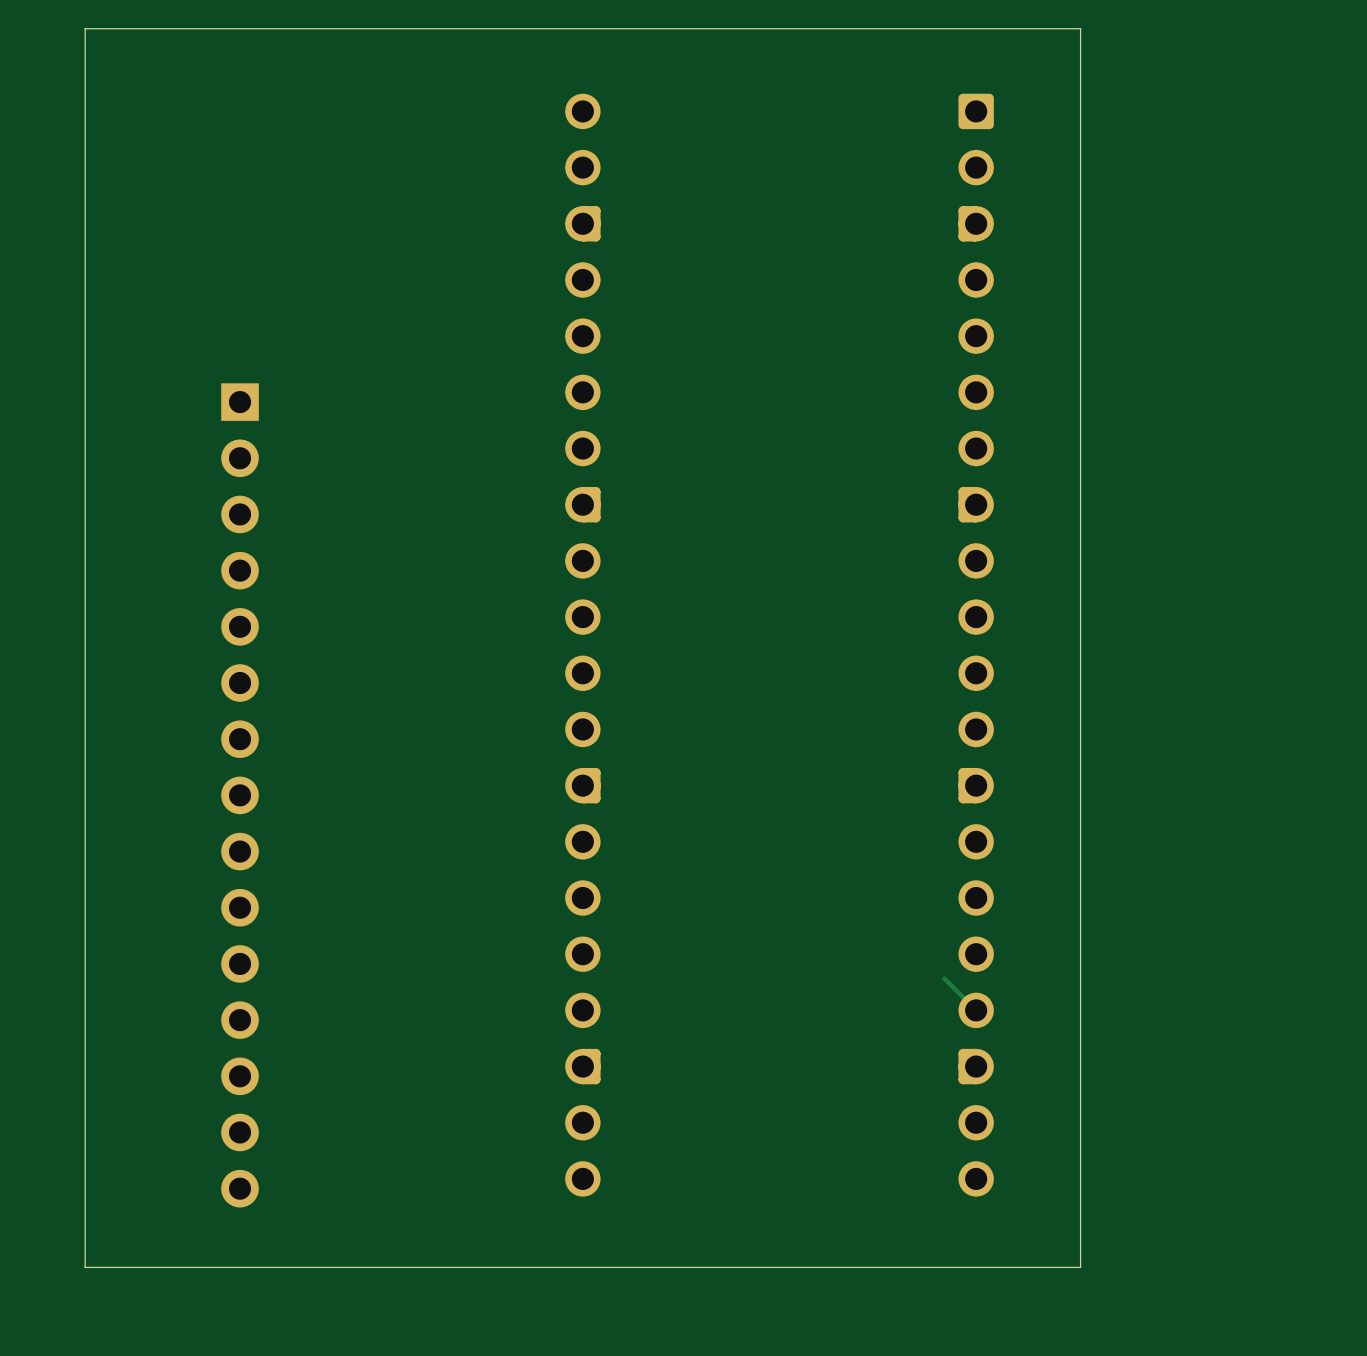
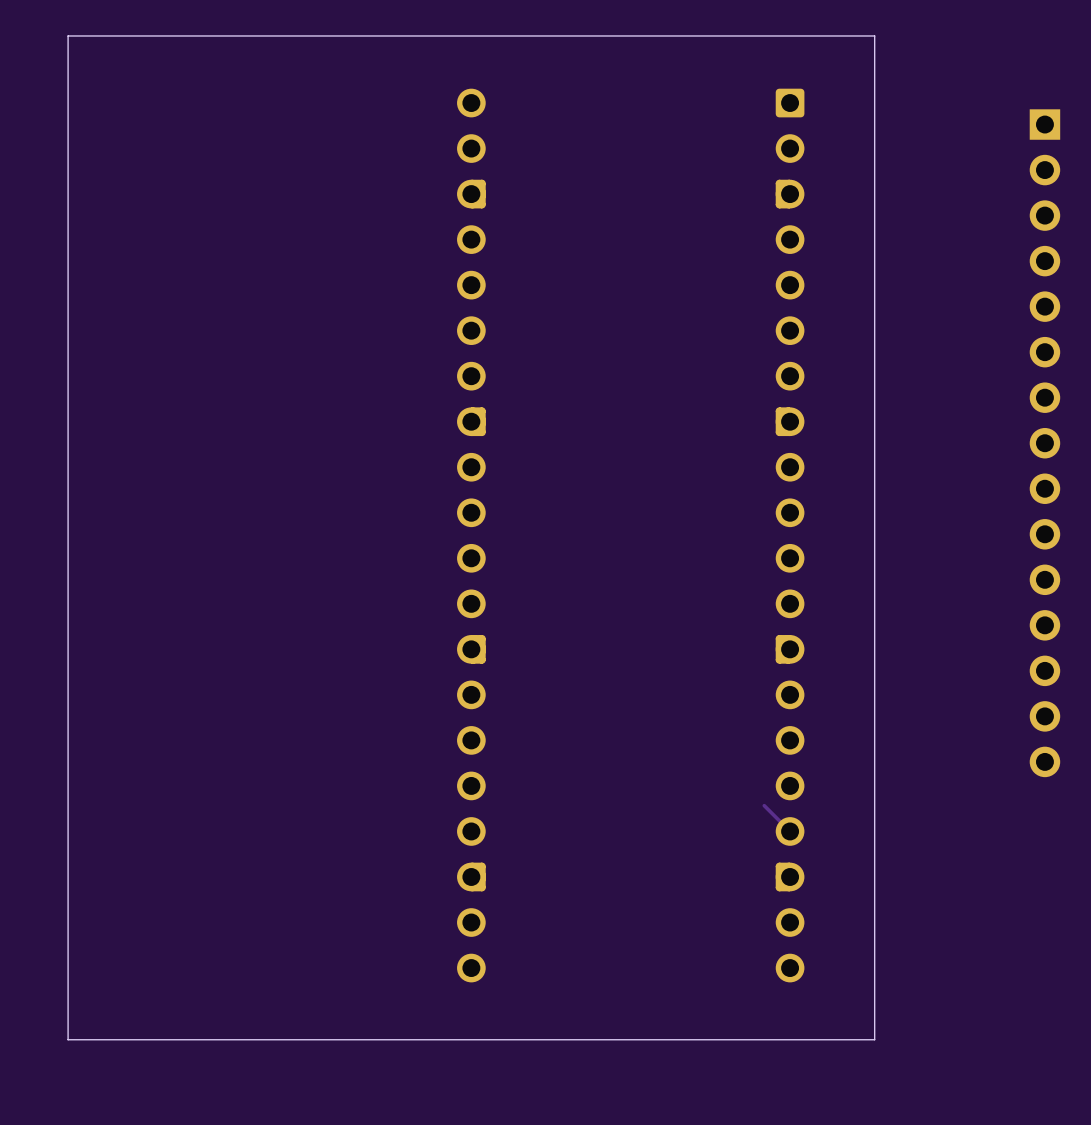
part: none -> (1044, 443)
part: (240, 795) -> none

